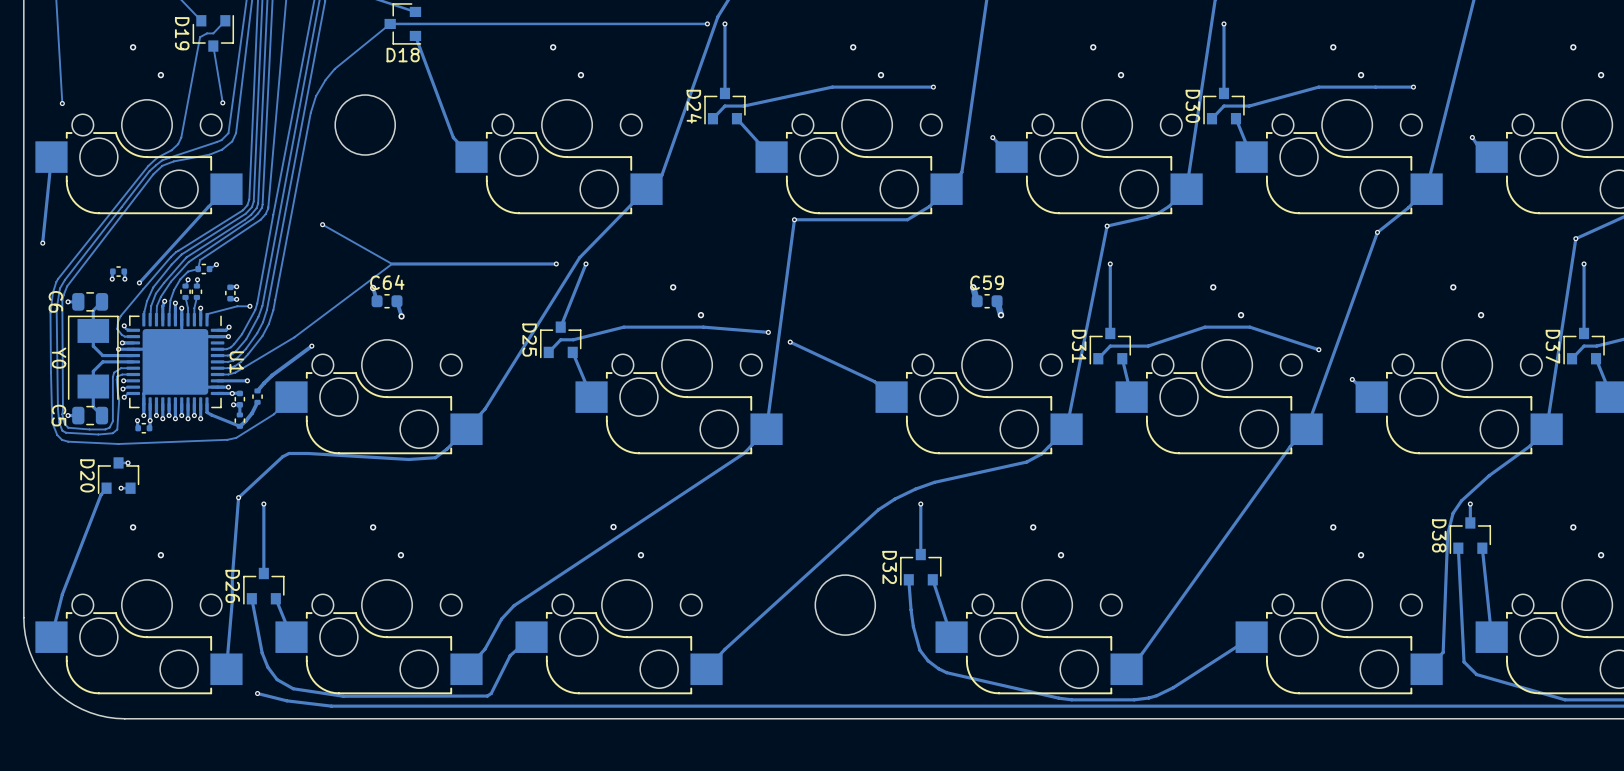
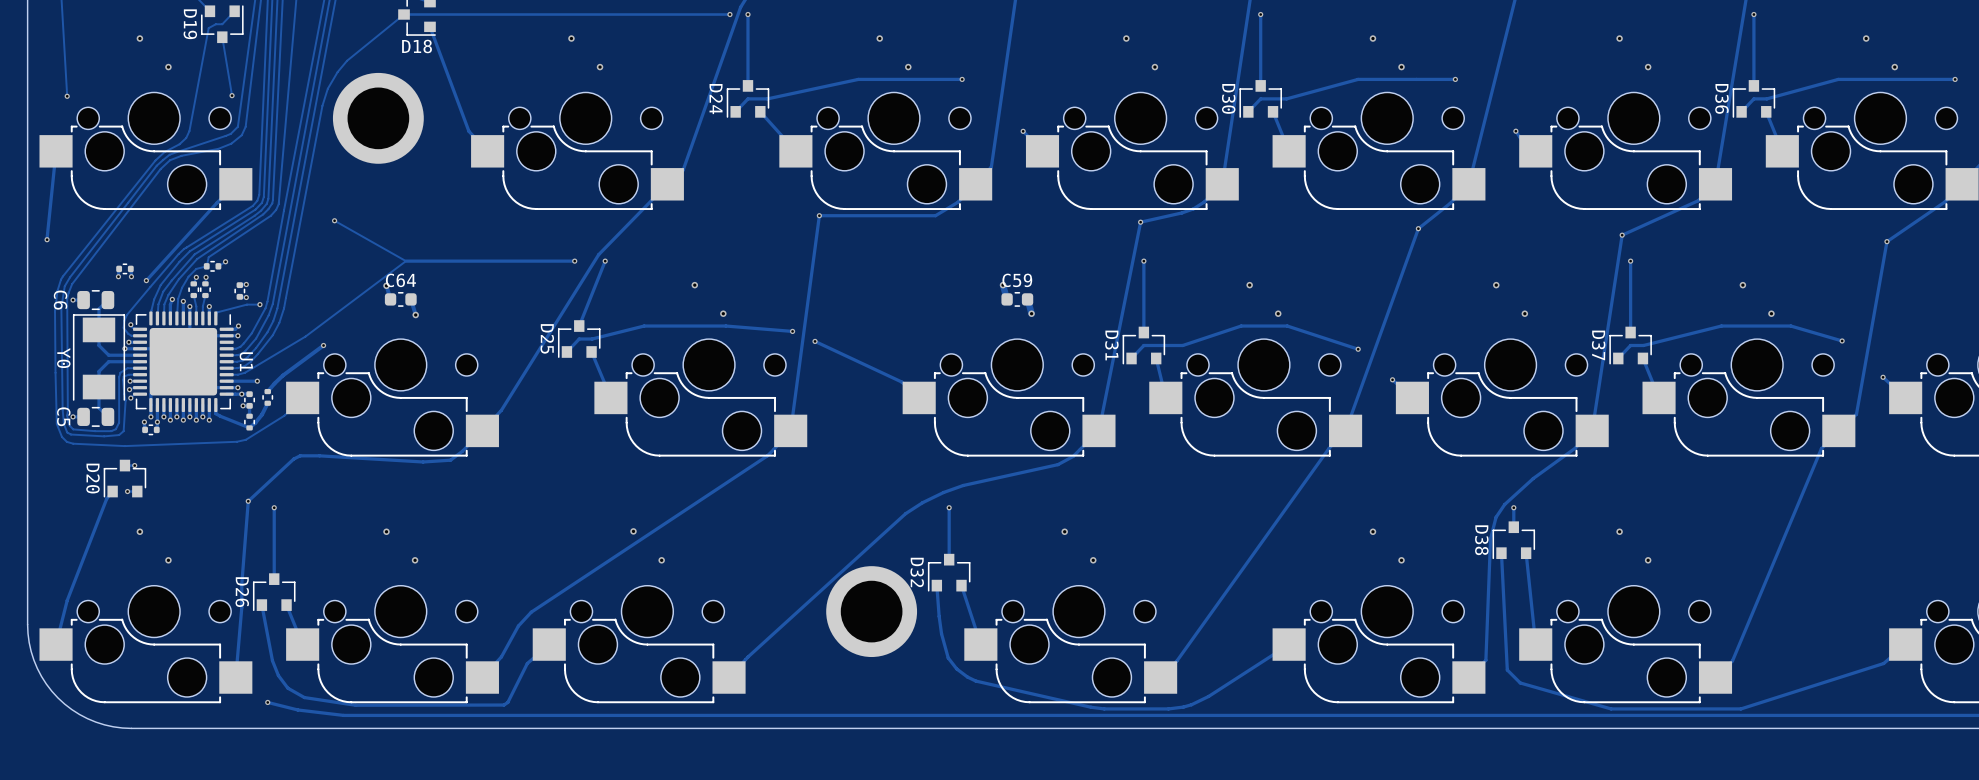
round board edge: [334, 94, 396, 156] -> none
part: none -> (378, 118)
round board edge: [814, 574, 876, 636] -> none
part: none -> (871, 611)

